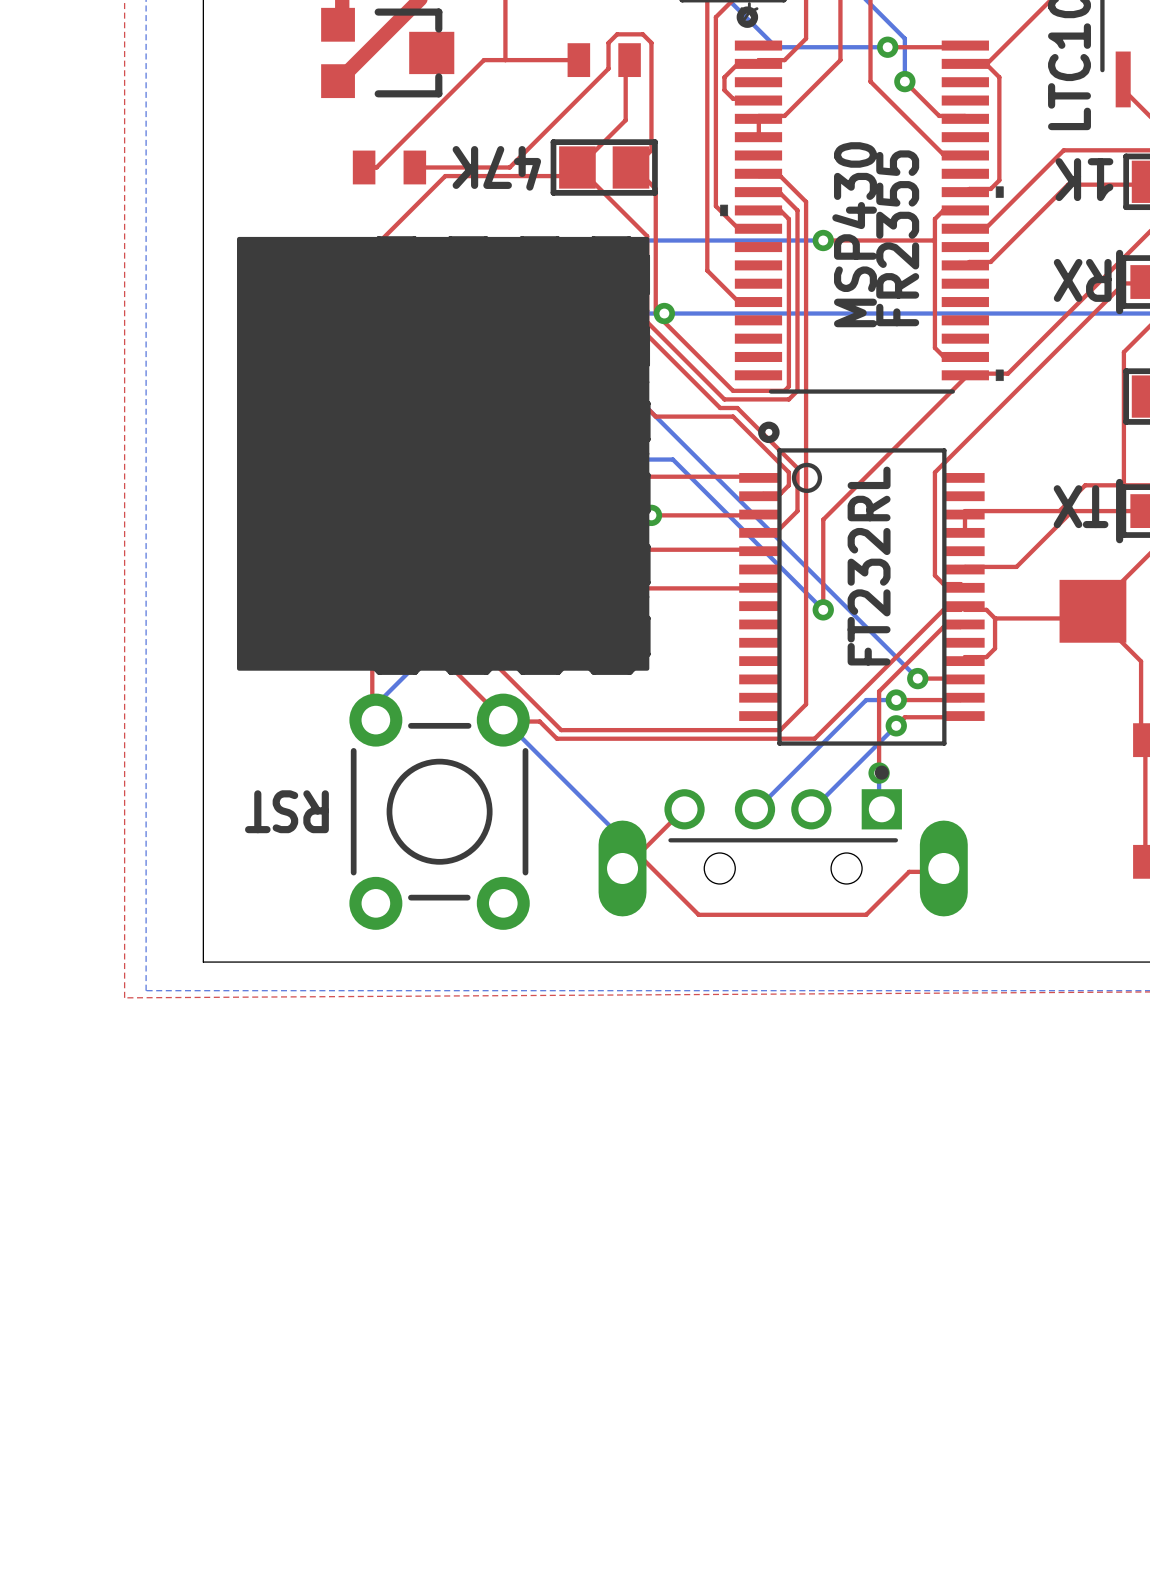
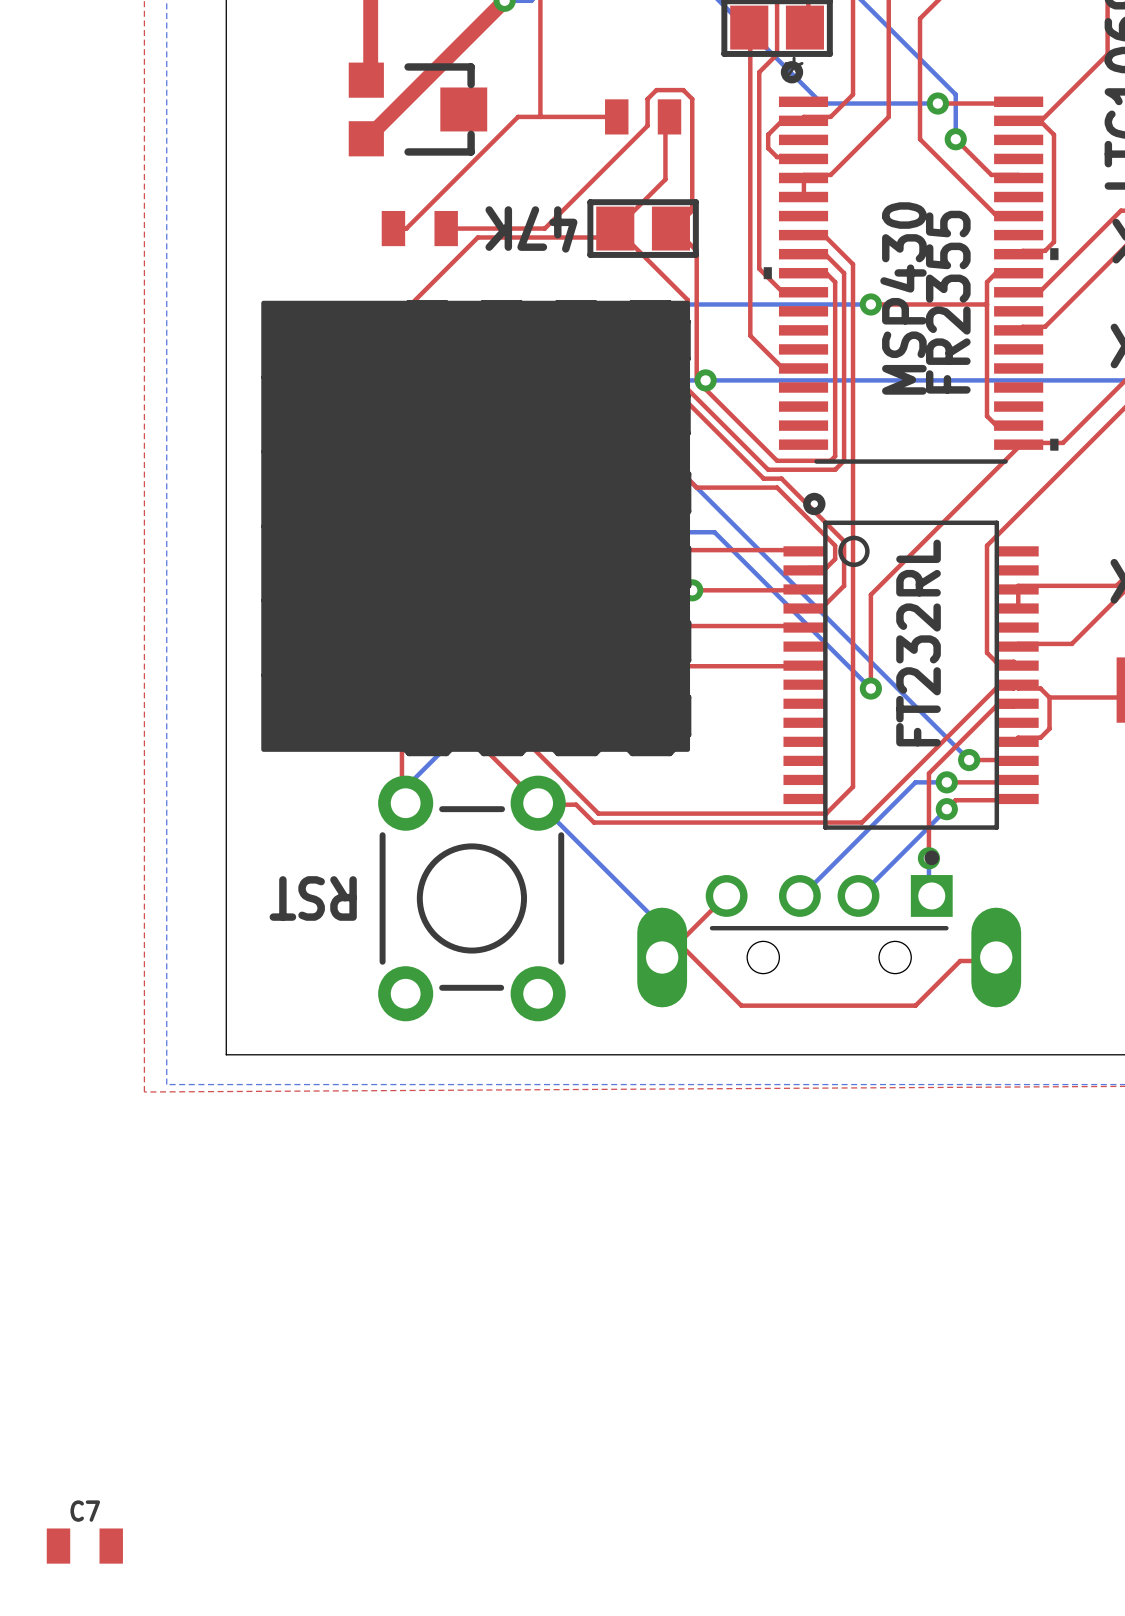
C7: none -> (84, 1546)

